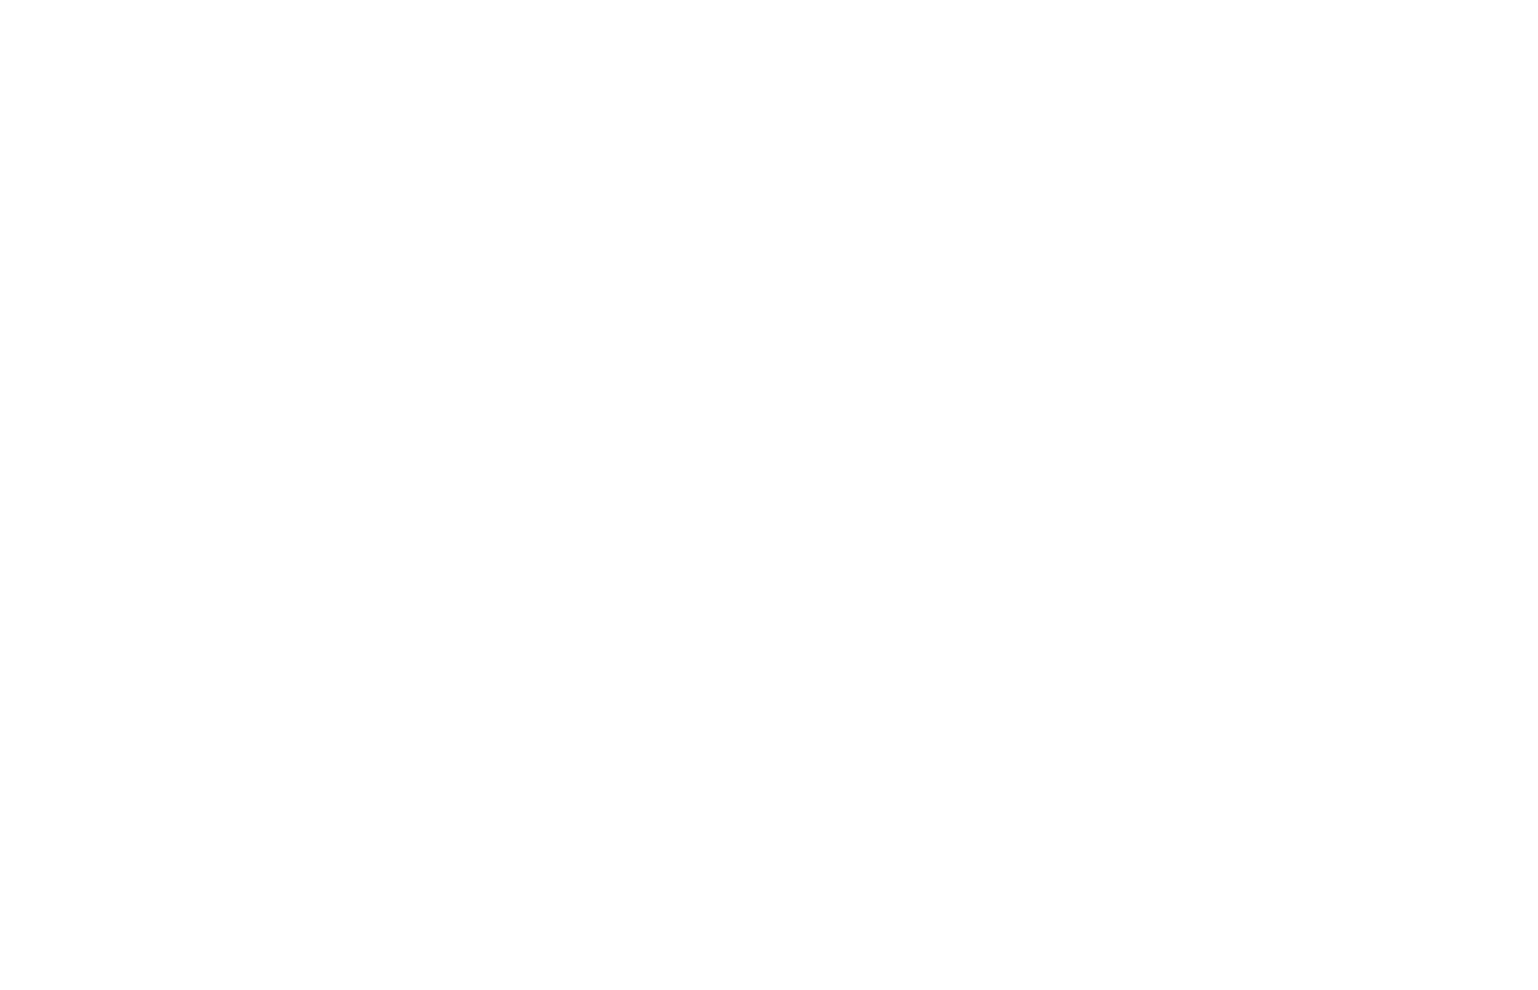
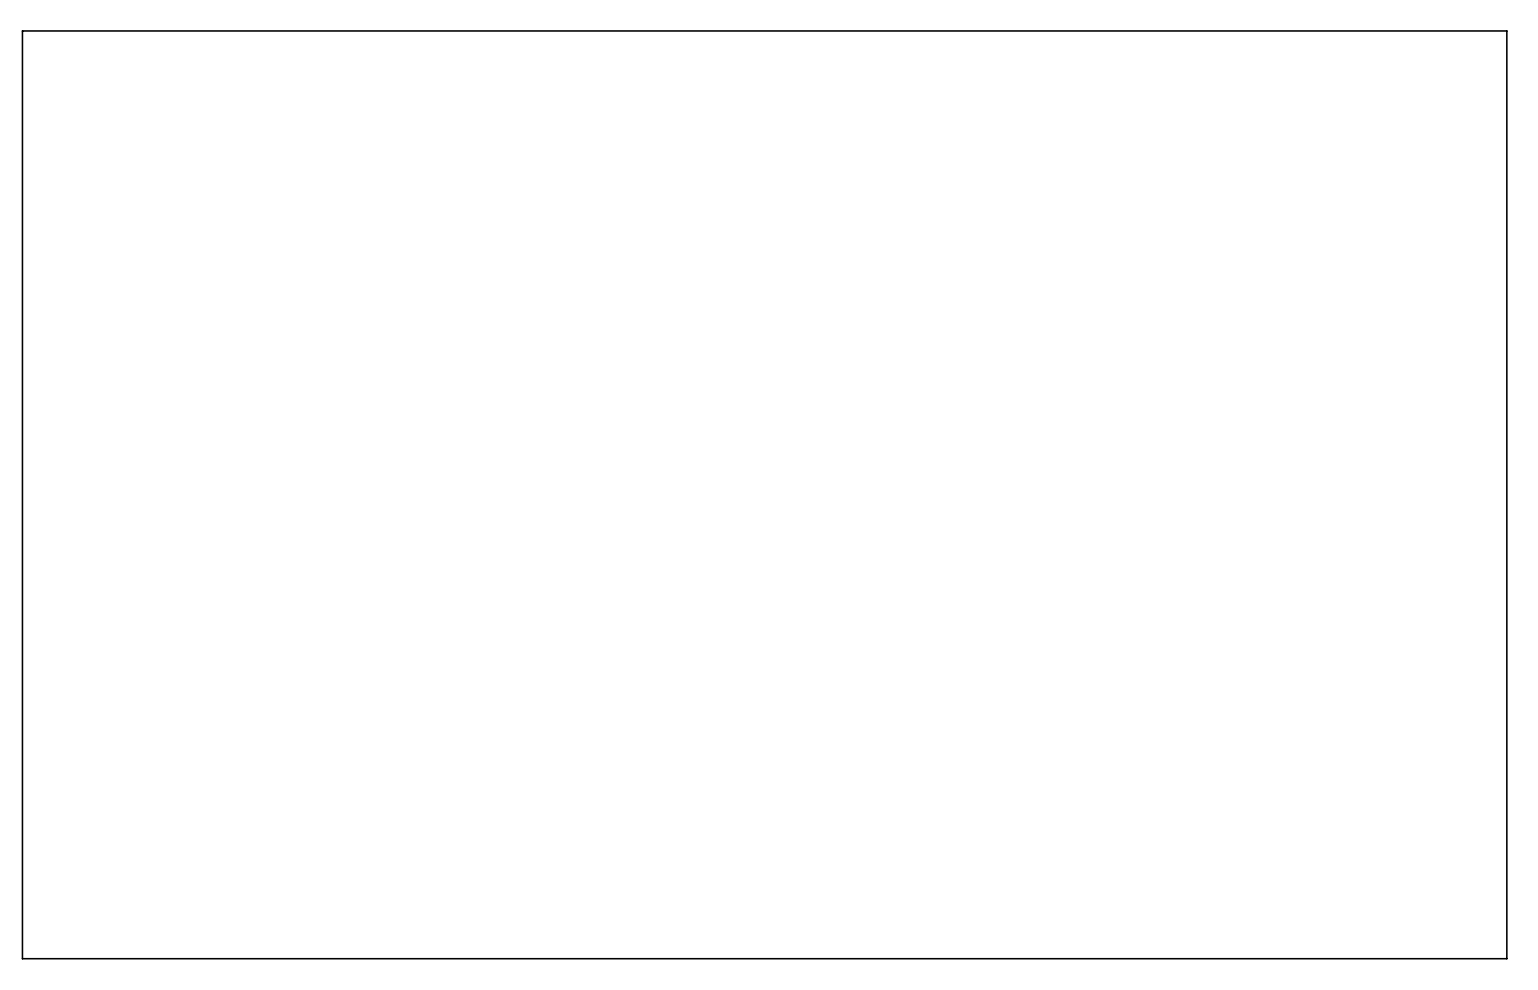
board edge: none -> (1506, 30) (22, 30) (22, 958) (1506, 958) (1506, 30)

